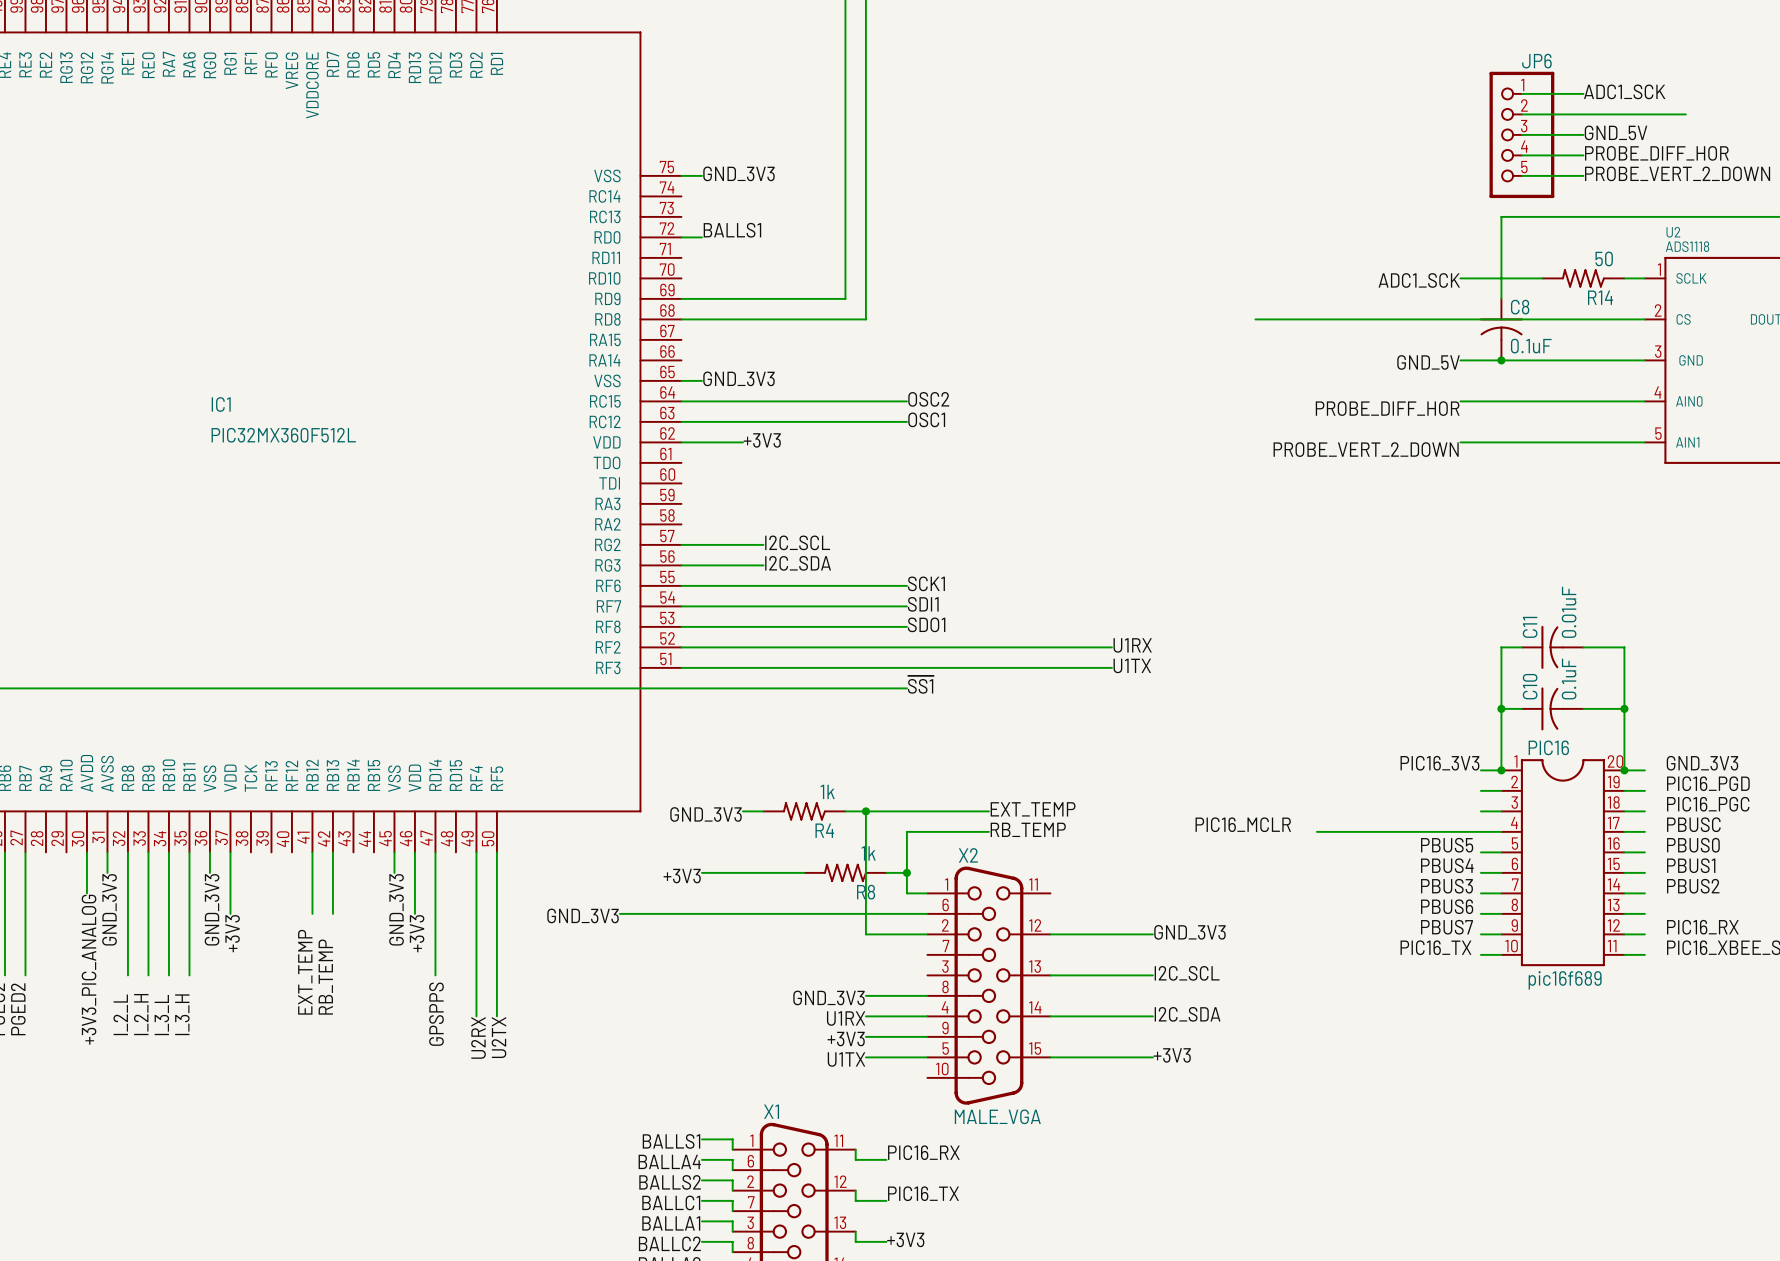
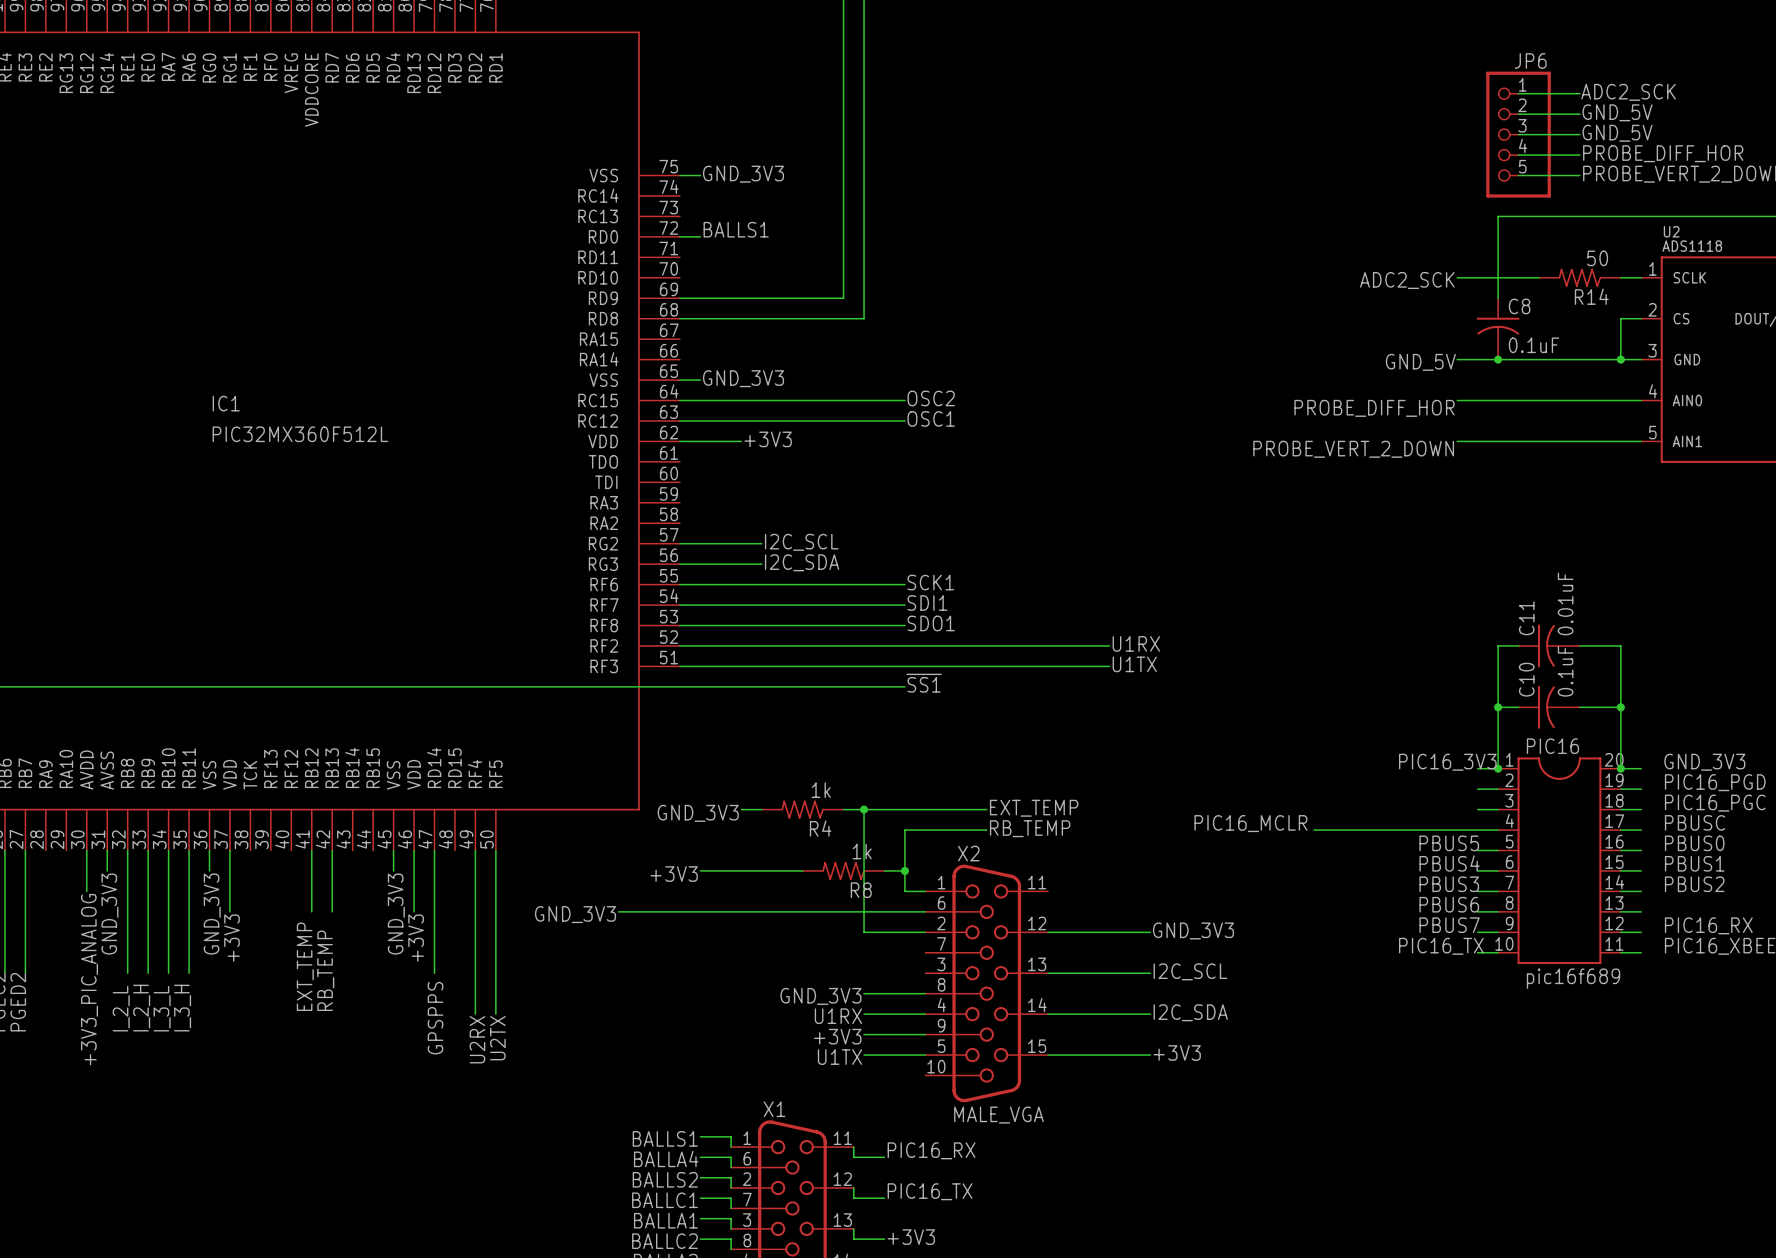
label: ADC1_SCK (1624, 91) -> ADC2_SCK (1628, 92)
label: none -> GND_5V (1617, 112)
wire: (1583, 114) (1685, 114) -> none
label: ADC1_SCK (1419, 280) -> ADC2_SCK (1407, 280)
wire: (1255, 319) (1624, 319) -> (1620, 359) (1620, 318)
junction: none -> (1620, 359)

